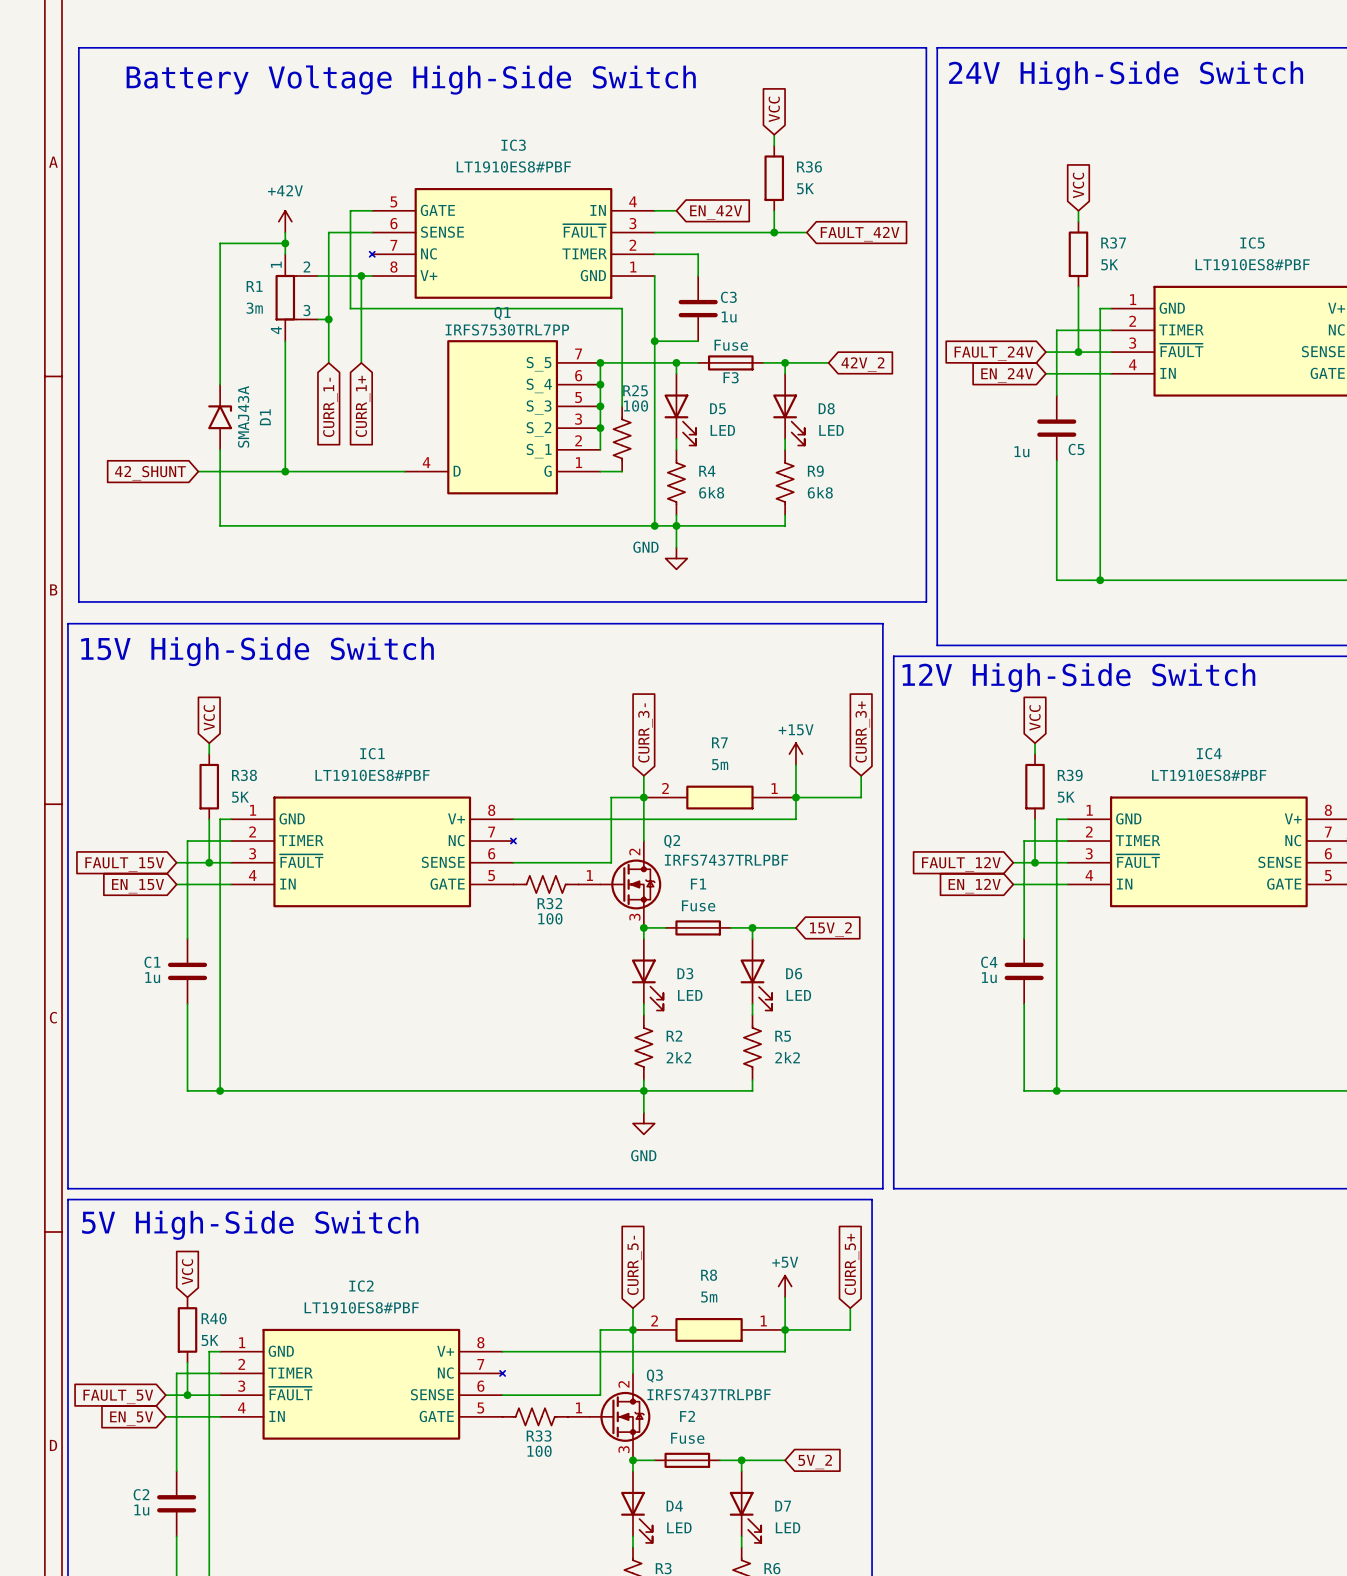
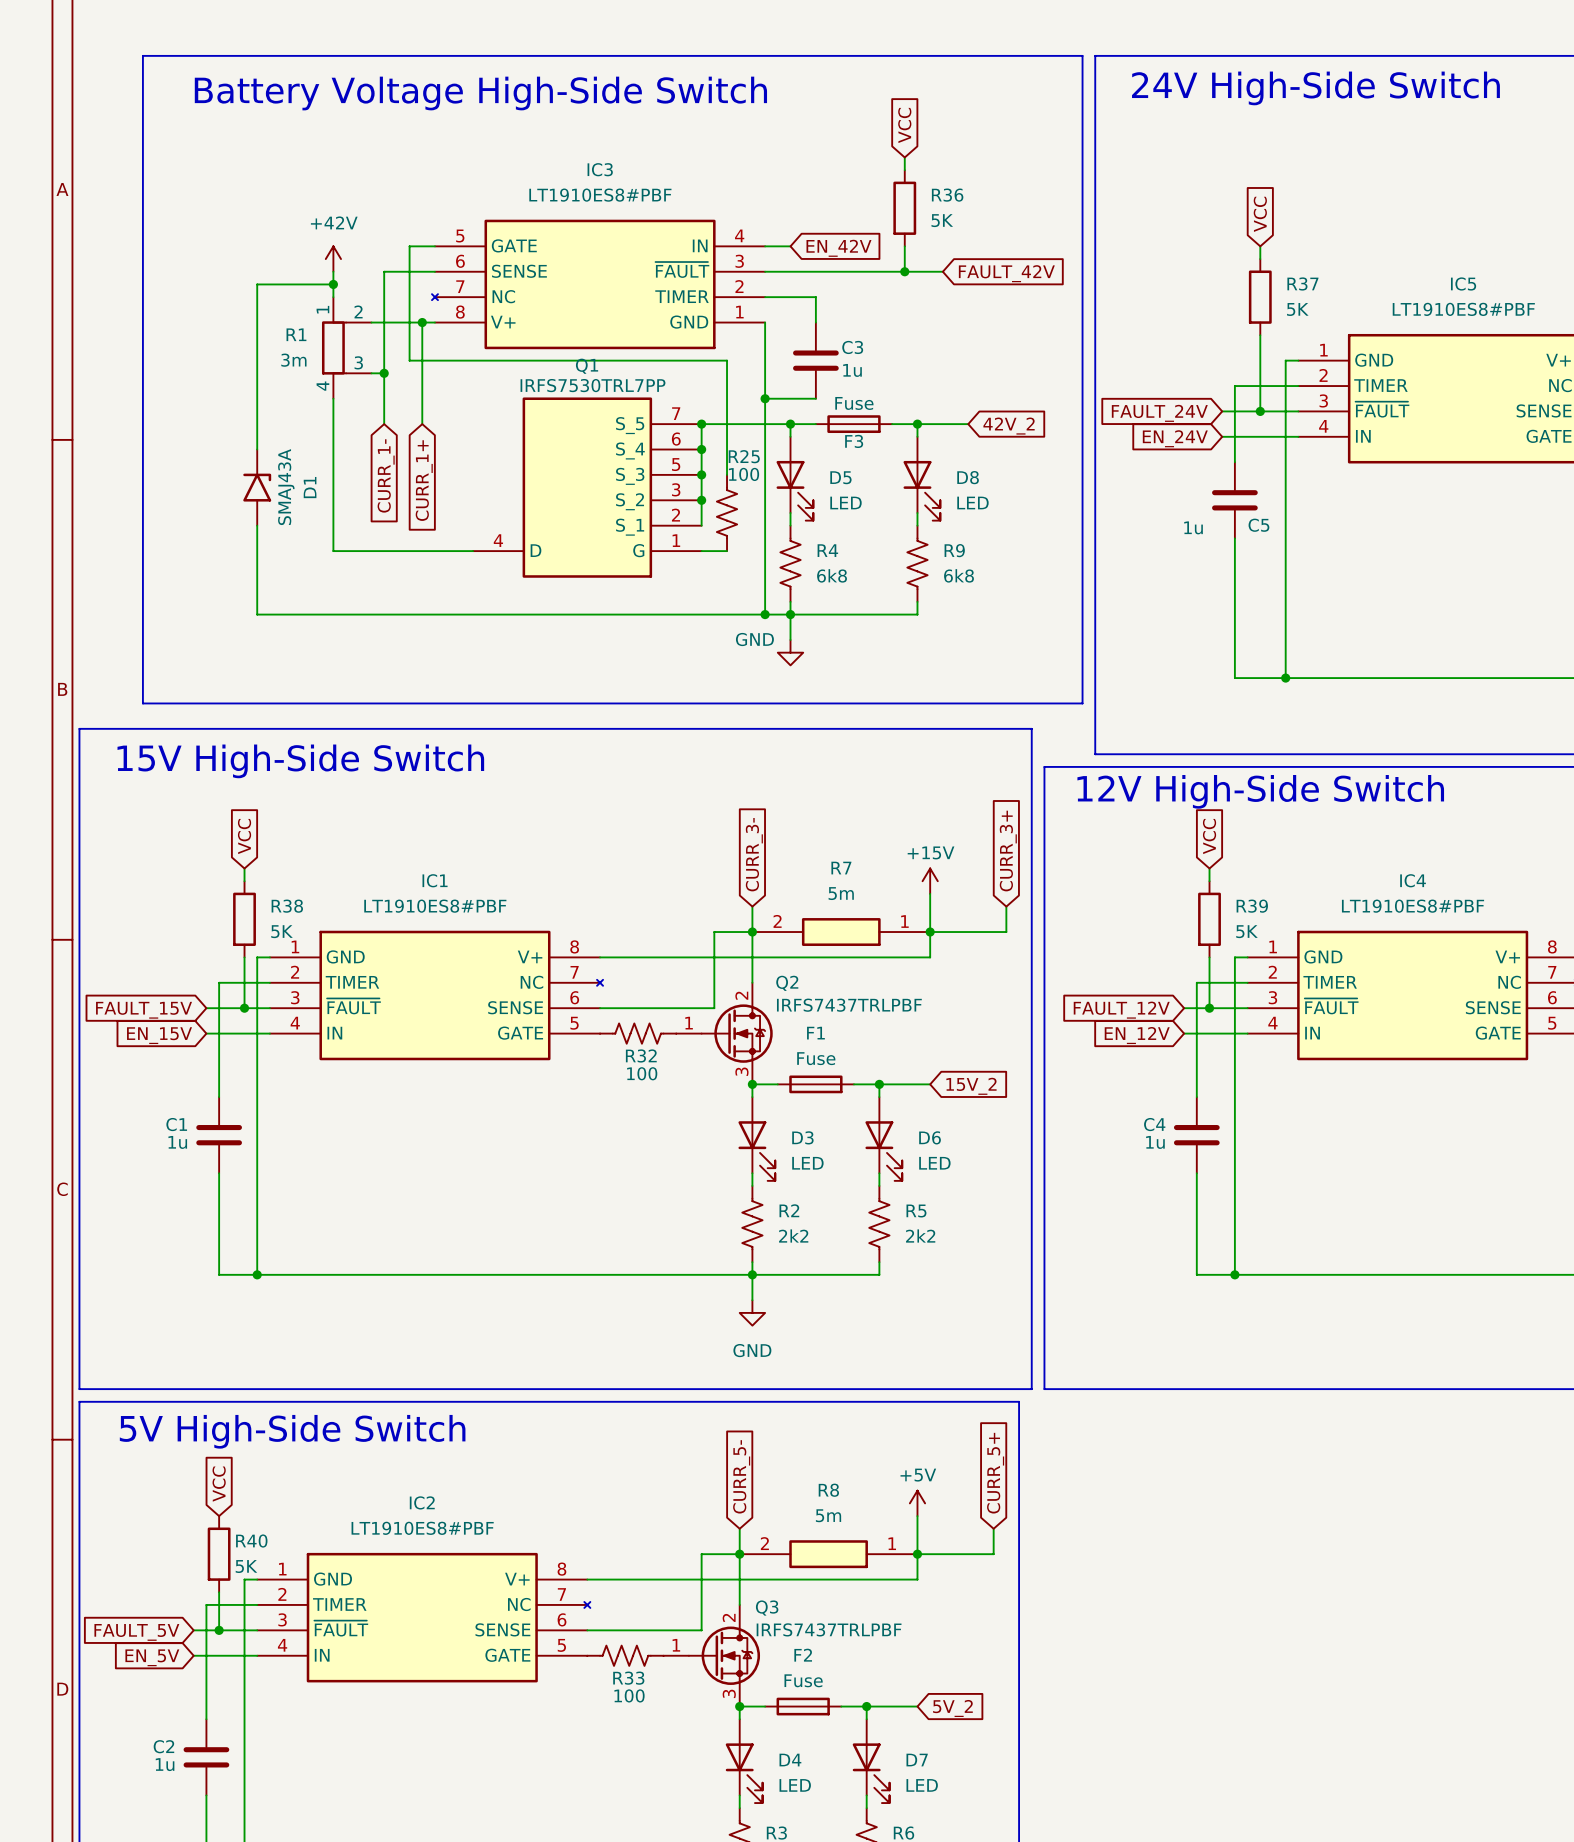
line: (122, 47) (78, 47) (78, 601) (122, 601) -> (142, 55) (142, 703)
wire: (198, 471) (285, 471) -> none
junction: (285, 471) -> none
global label: 42_SHUNT (150, 473) -> none

